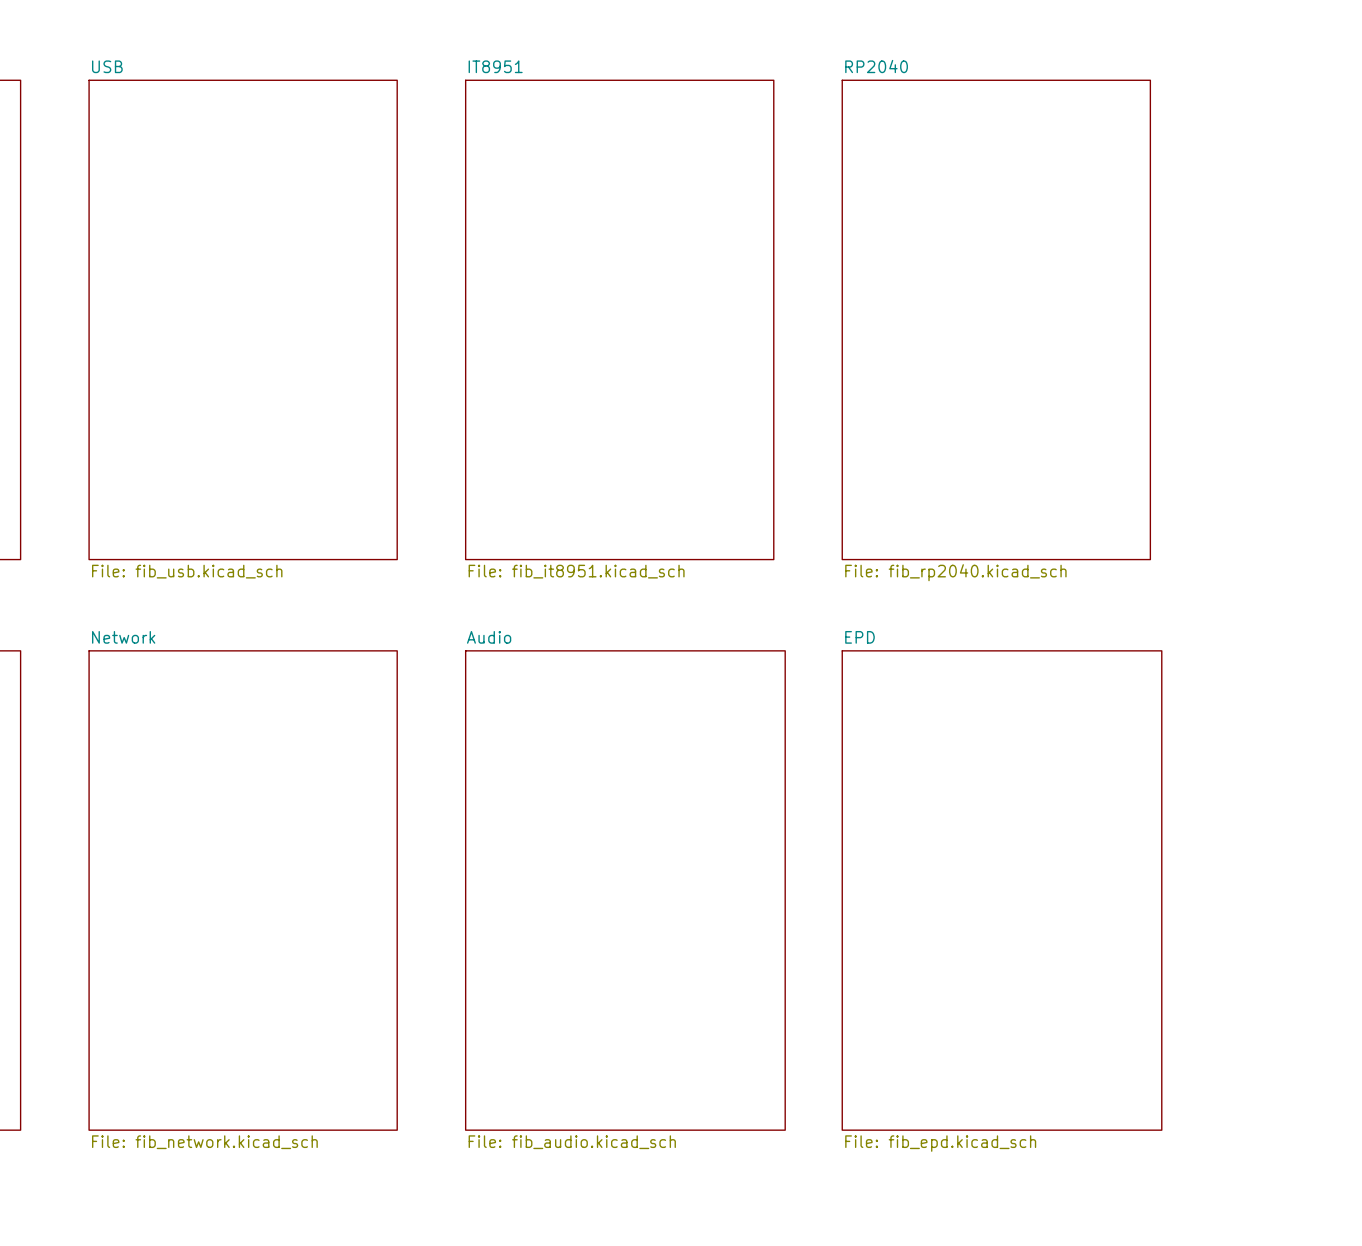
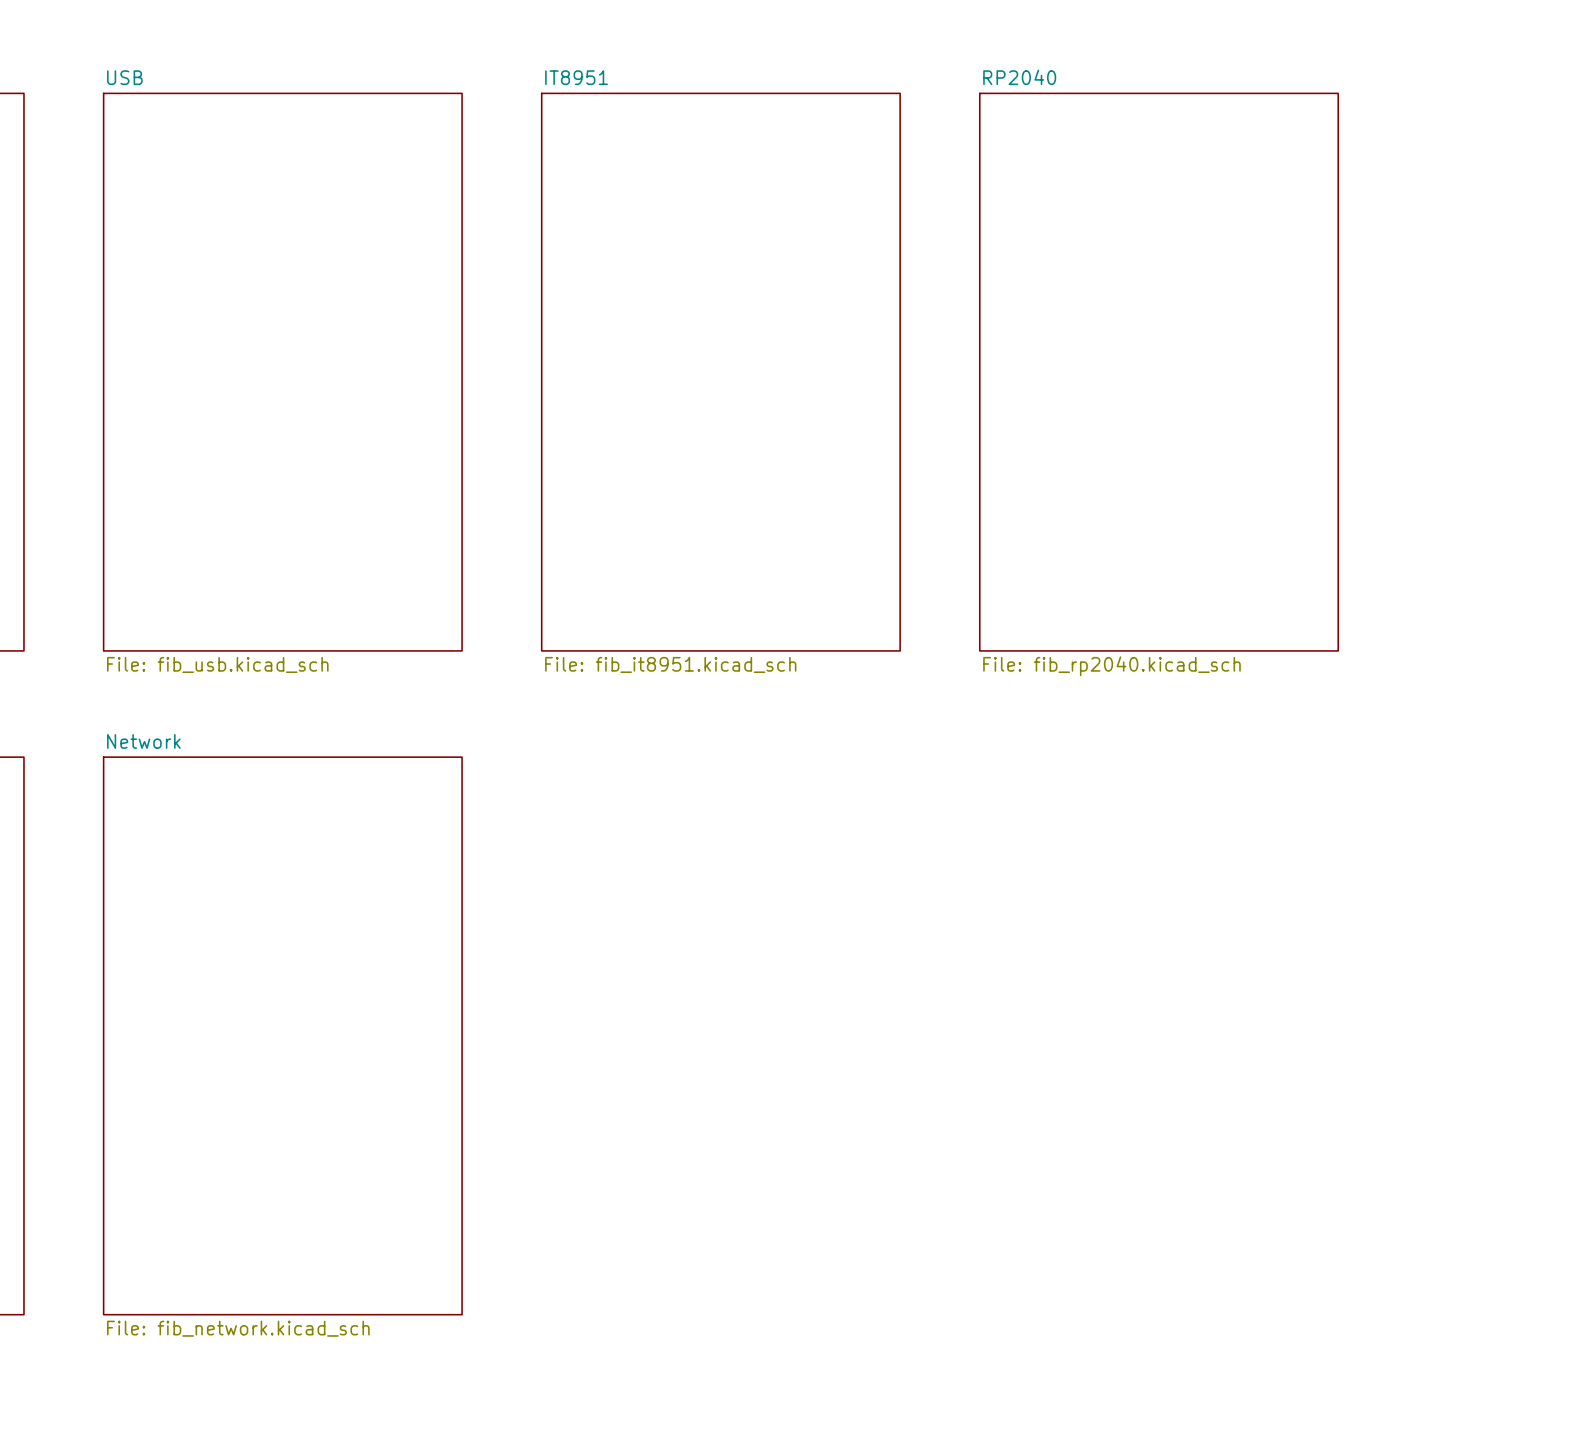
sheet Audio: File: fib_audio.kicad_sch (625, 890) -> none
sheet EPD: File: fib_epd.kicad_sch (1002, 890) -> none

